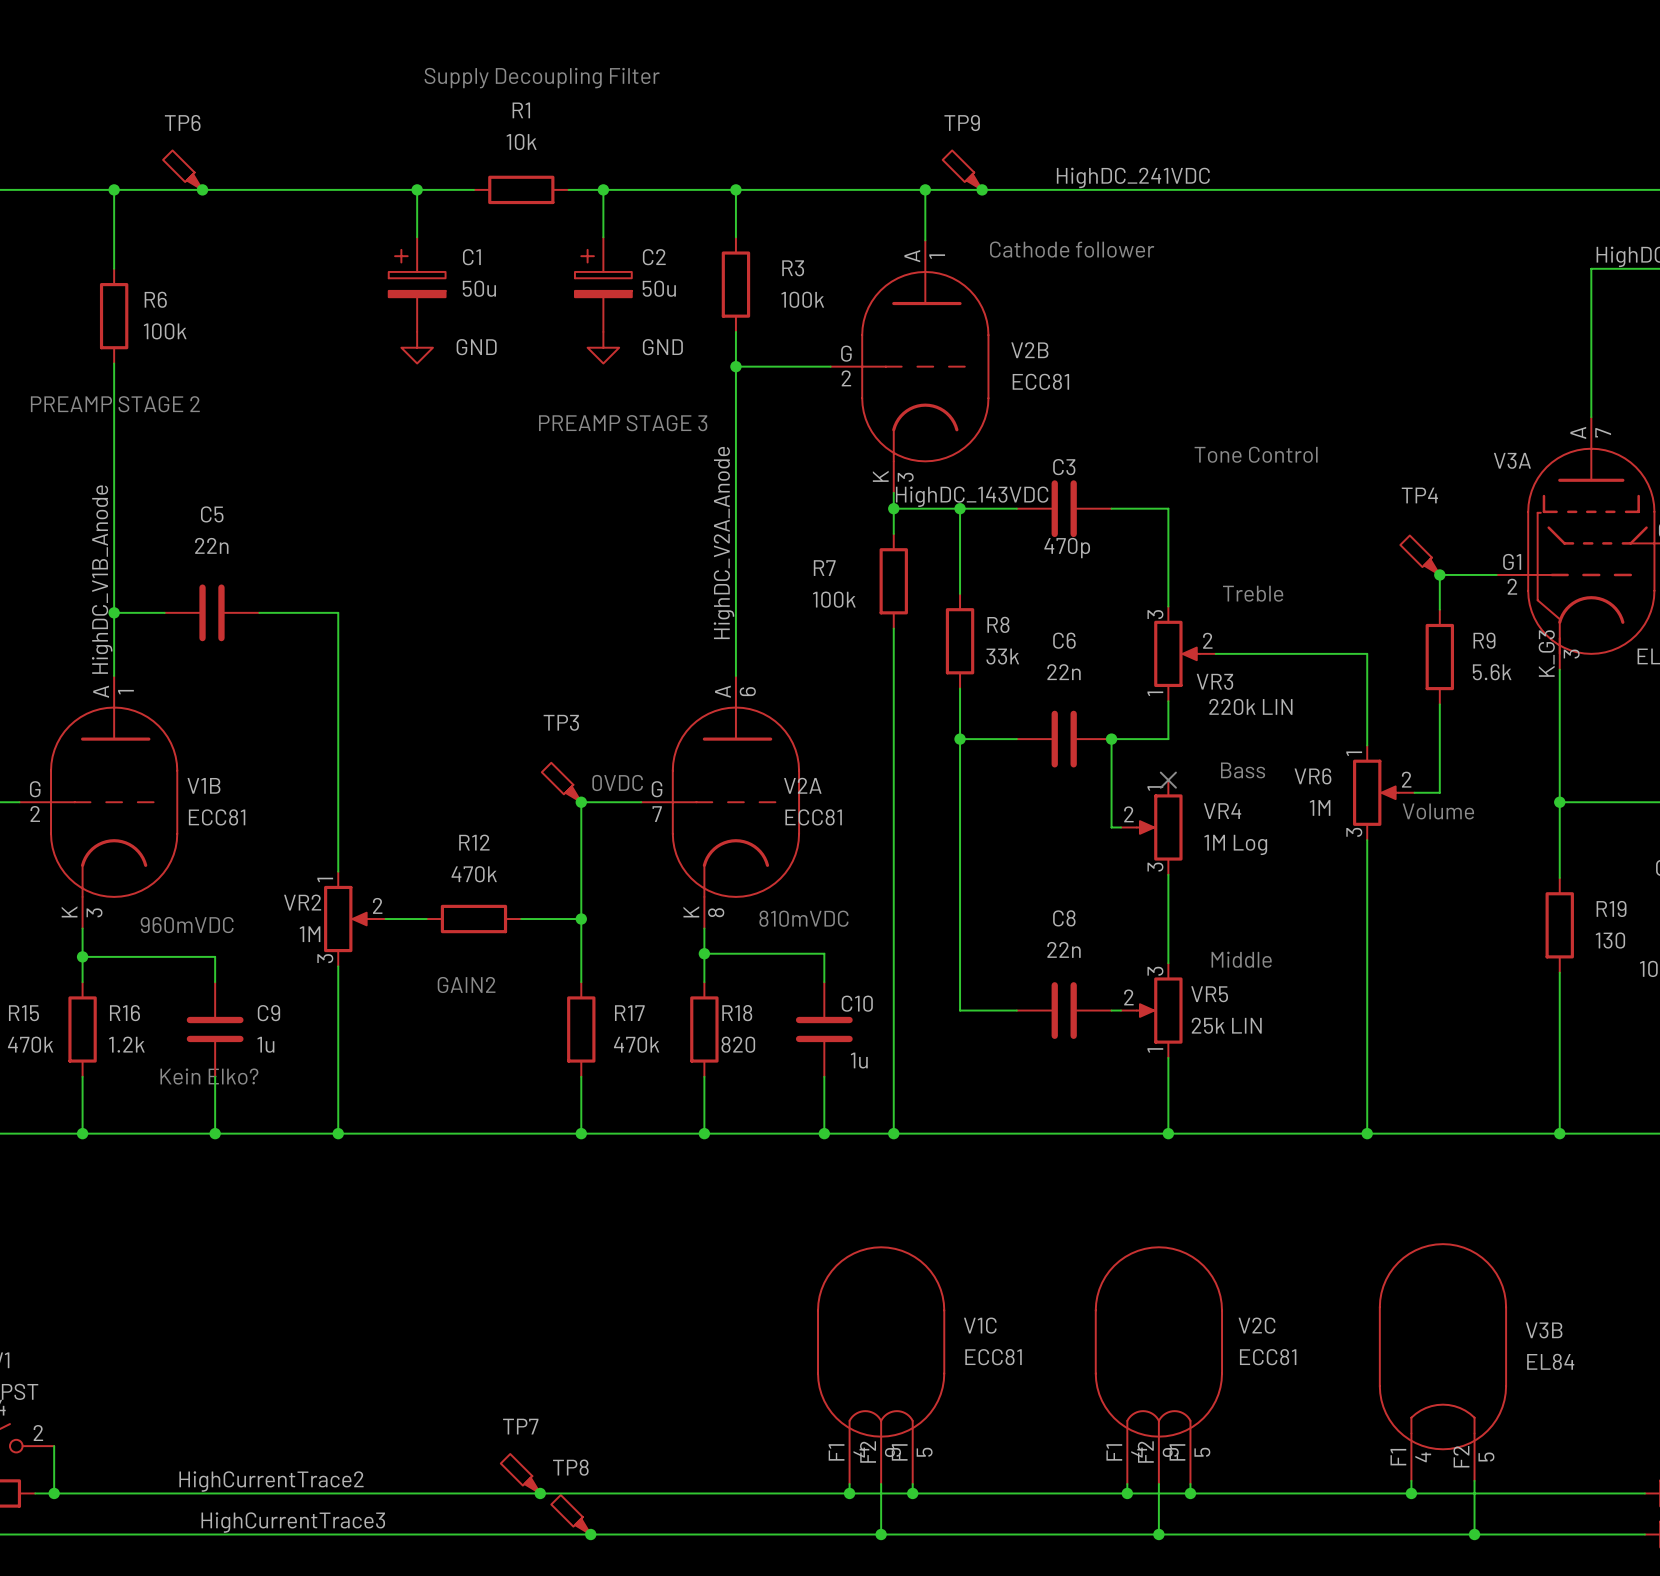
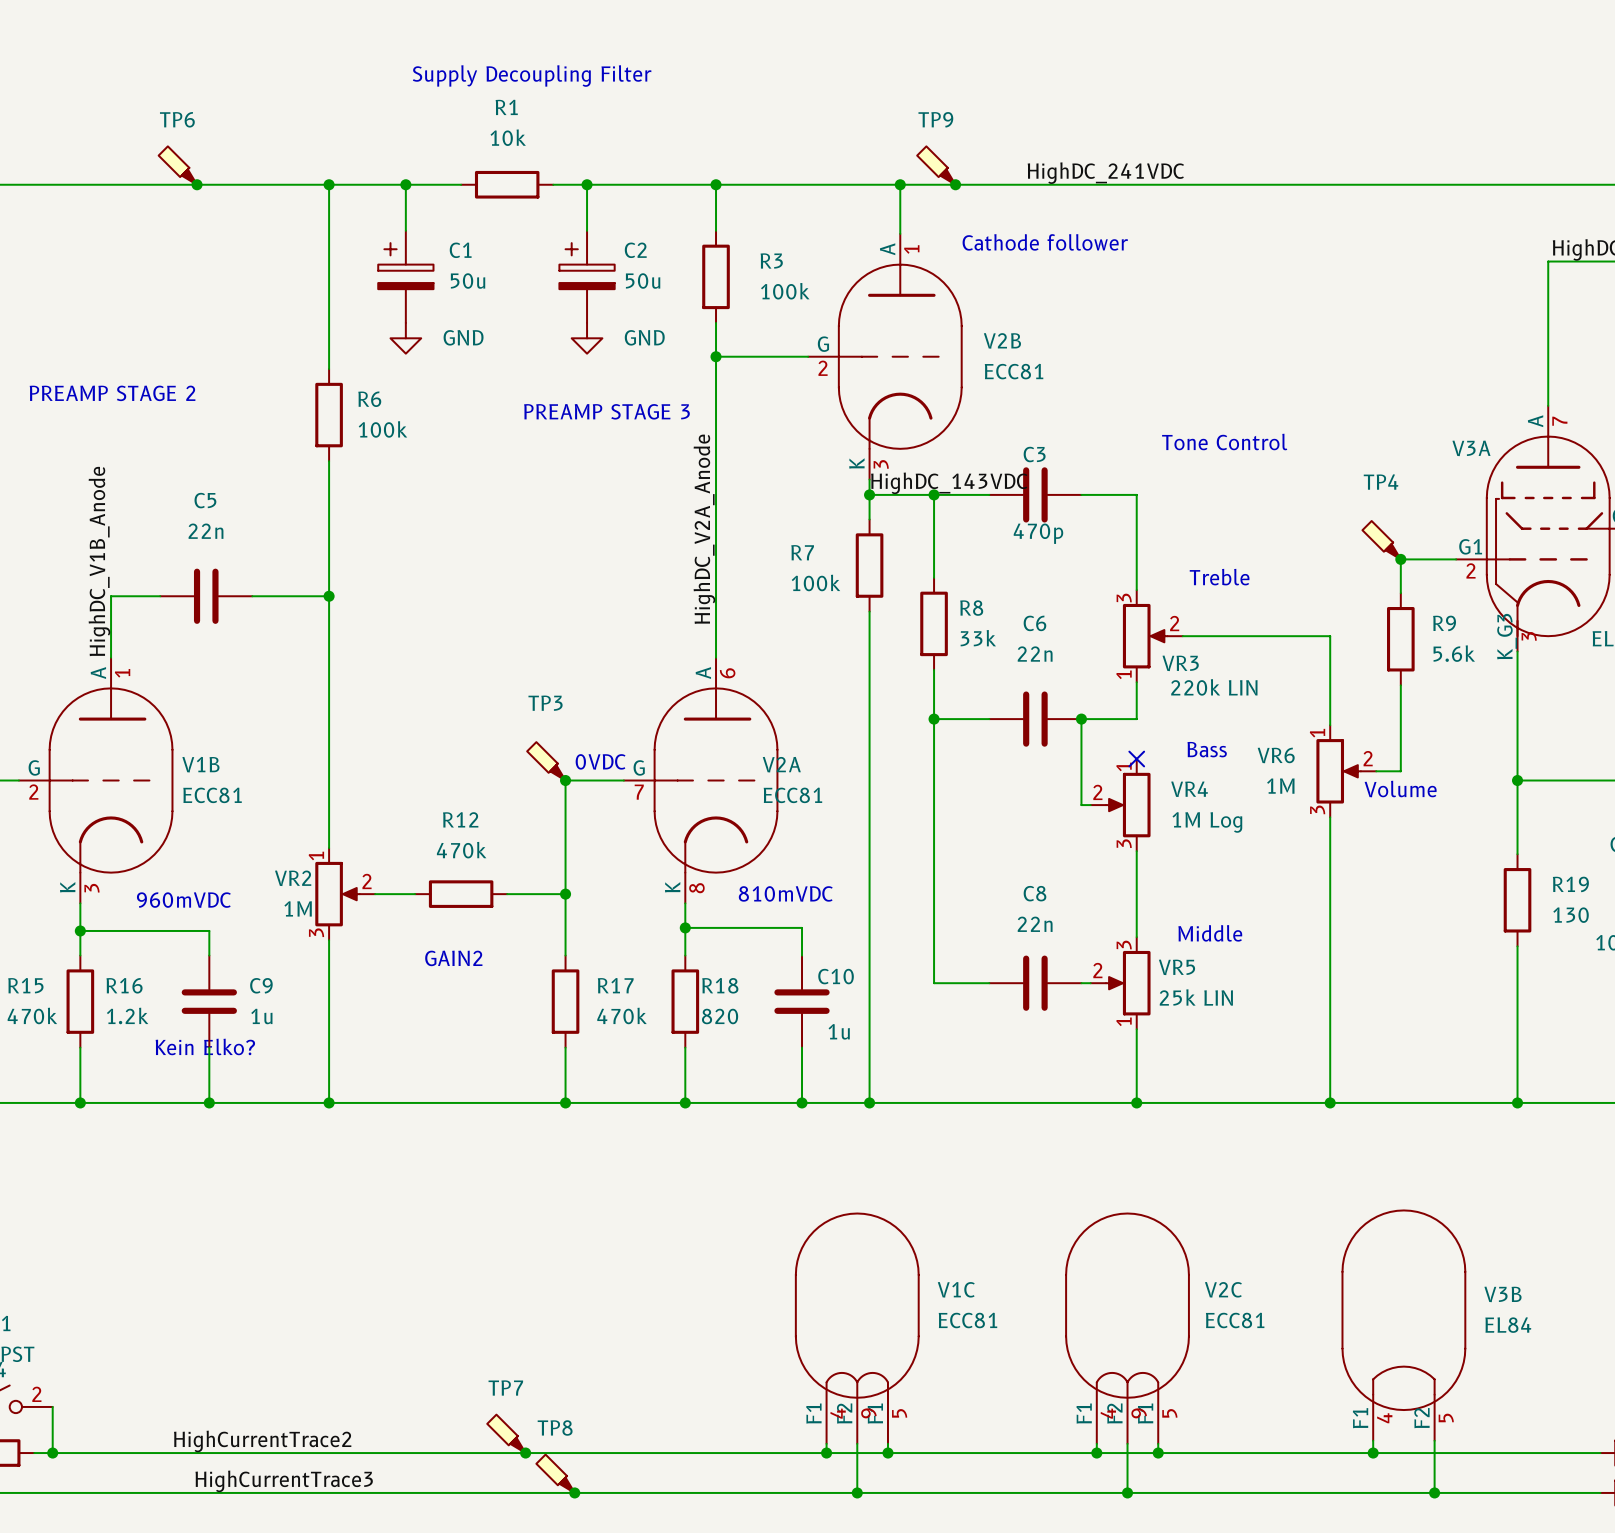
wire: (114, 189) (114, 268) -> none
junction: (114, 189) -> none
wire: none -> (329, 184) (329, 369)
junction: none -> (329, 184)
R6 position: (114, 316) -> (329, 415)
wire: (114, 363) (114, 612) -> none
wire: none -> (329, 461) (329, 596)
junction: (114, 612) -> none
junction: none -> (329, 596)

